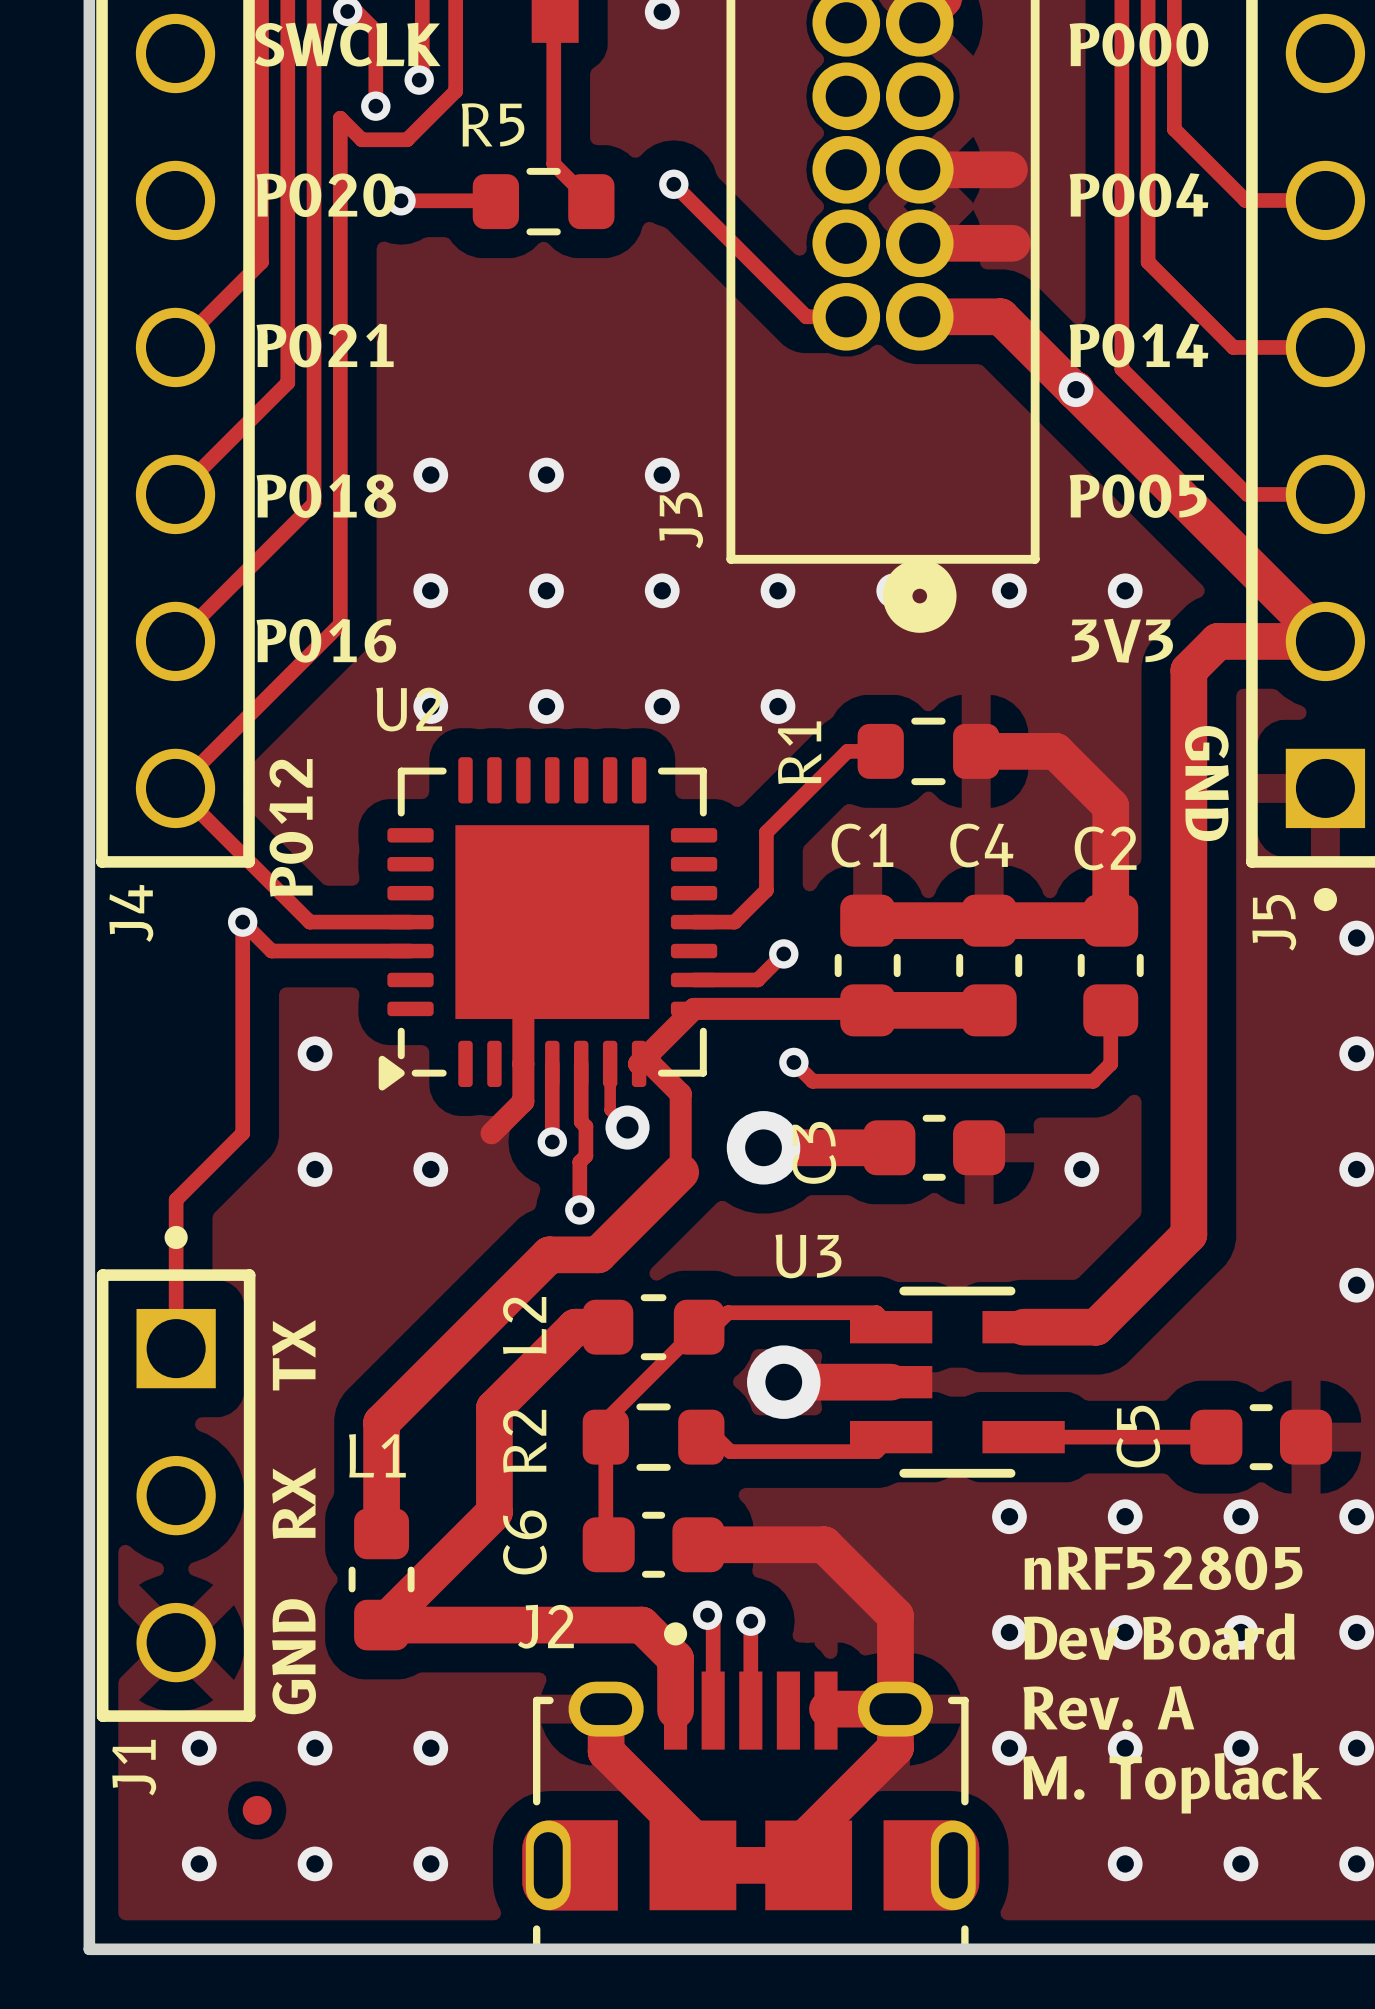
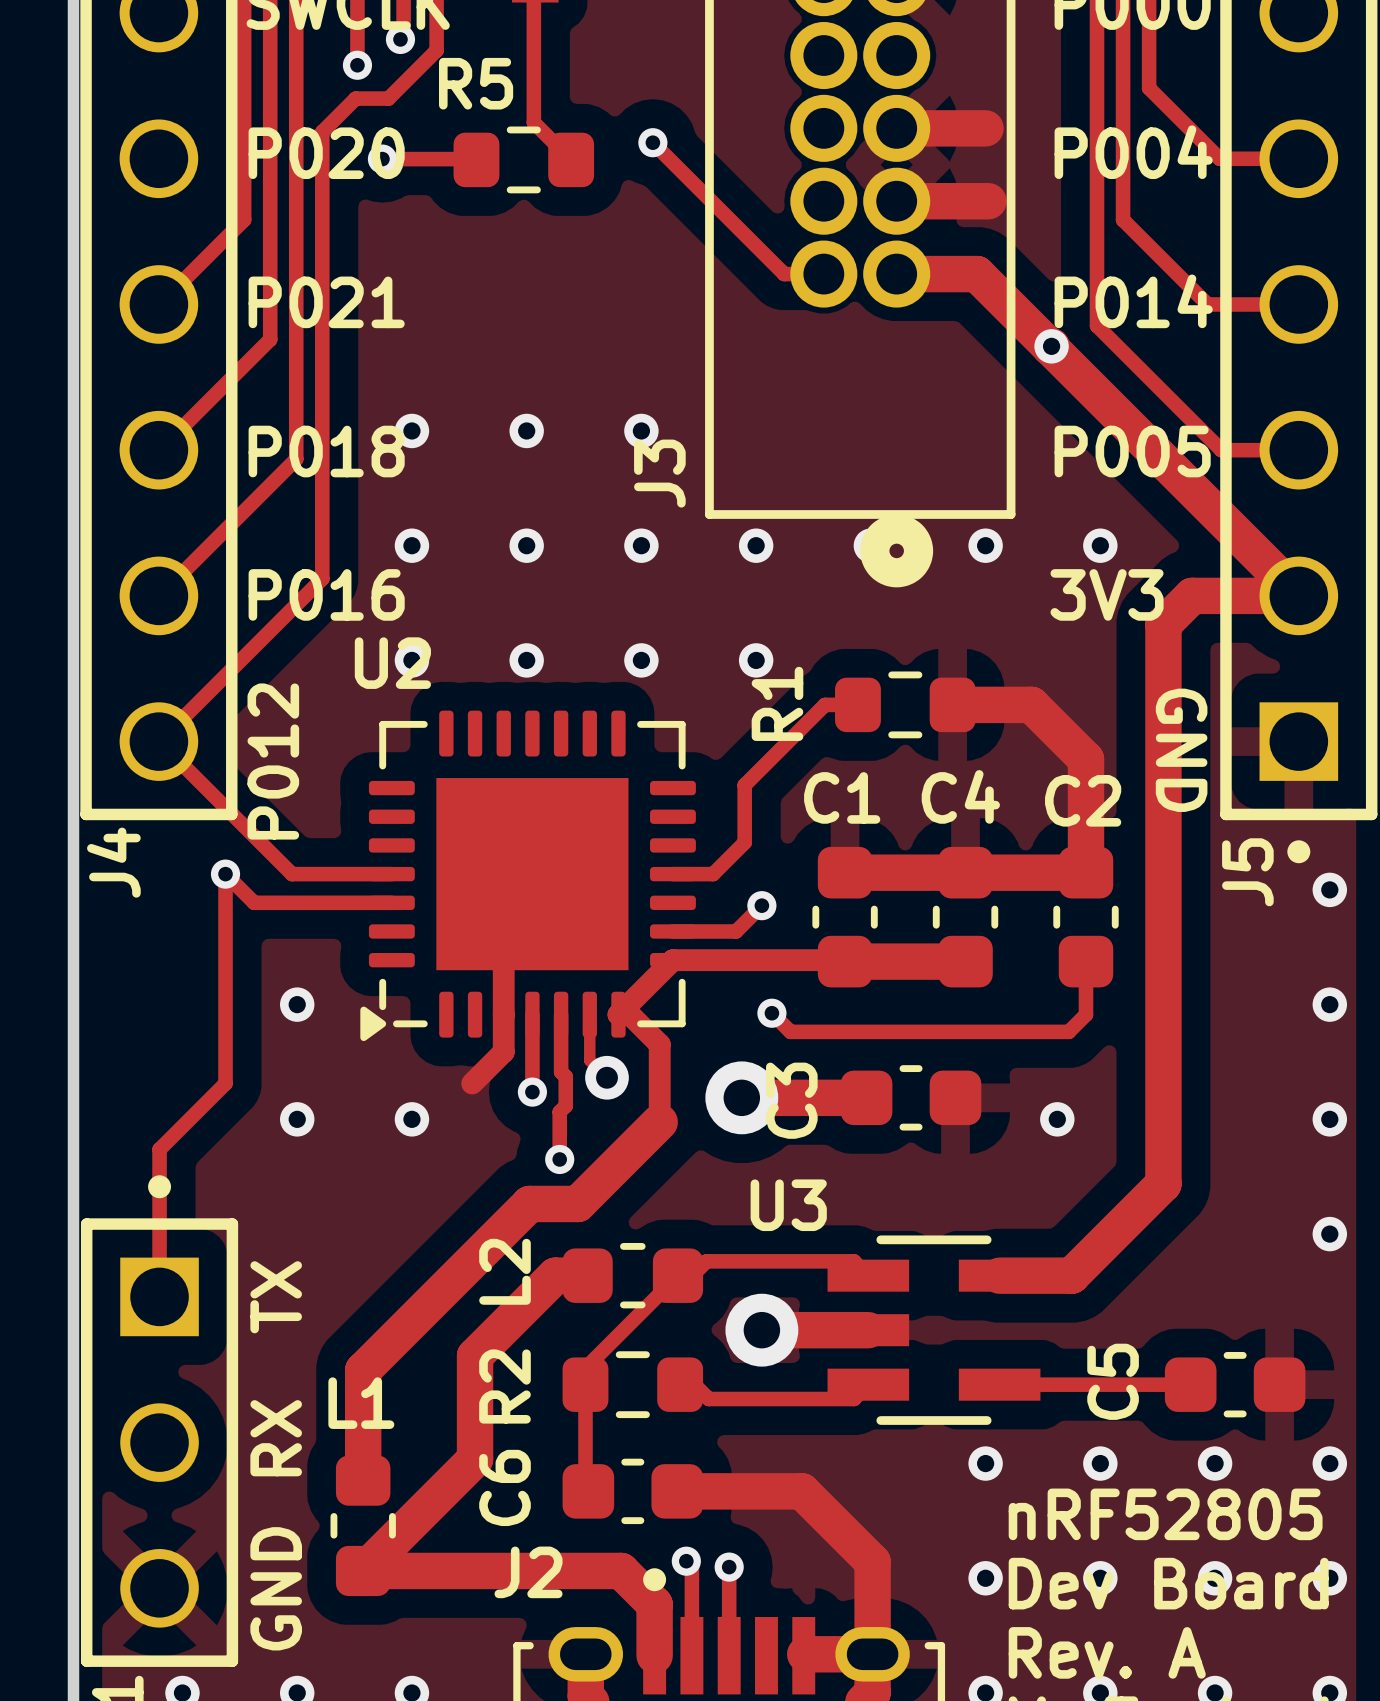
track: (374, 139) (361, 139) (340, 118) (340, 173) -> (355, 98) (322, 131)

